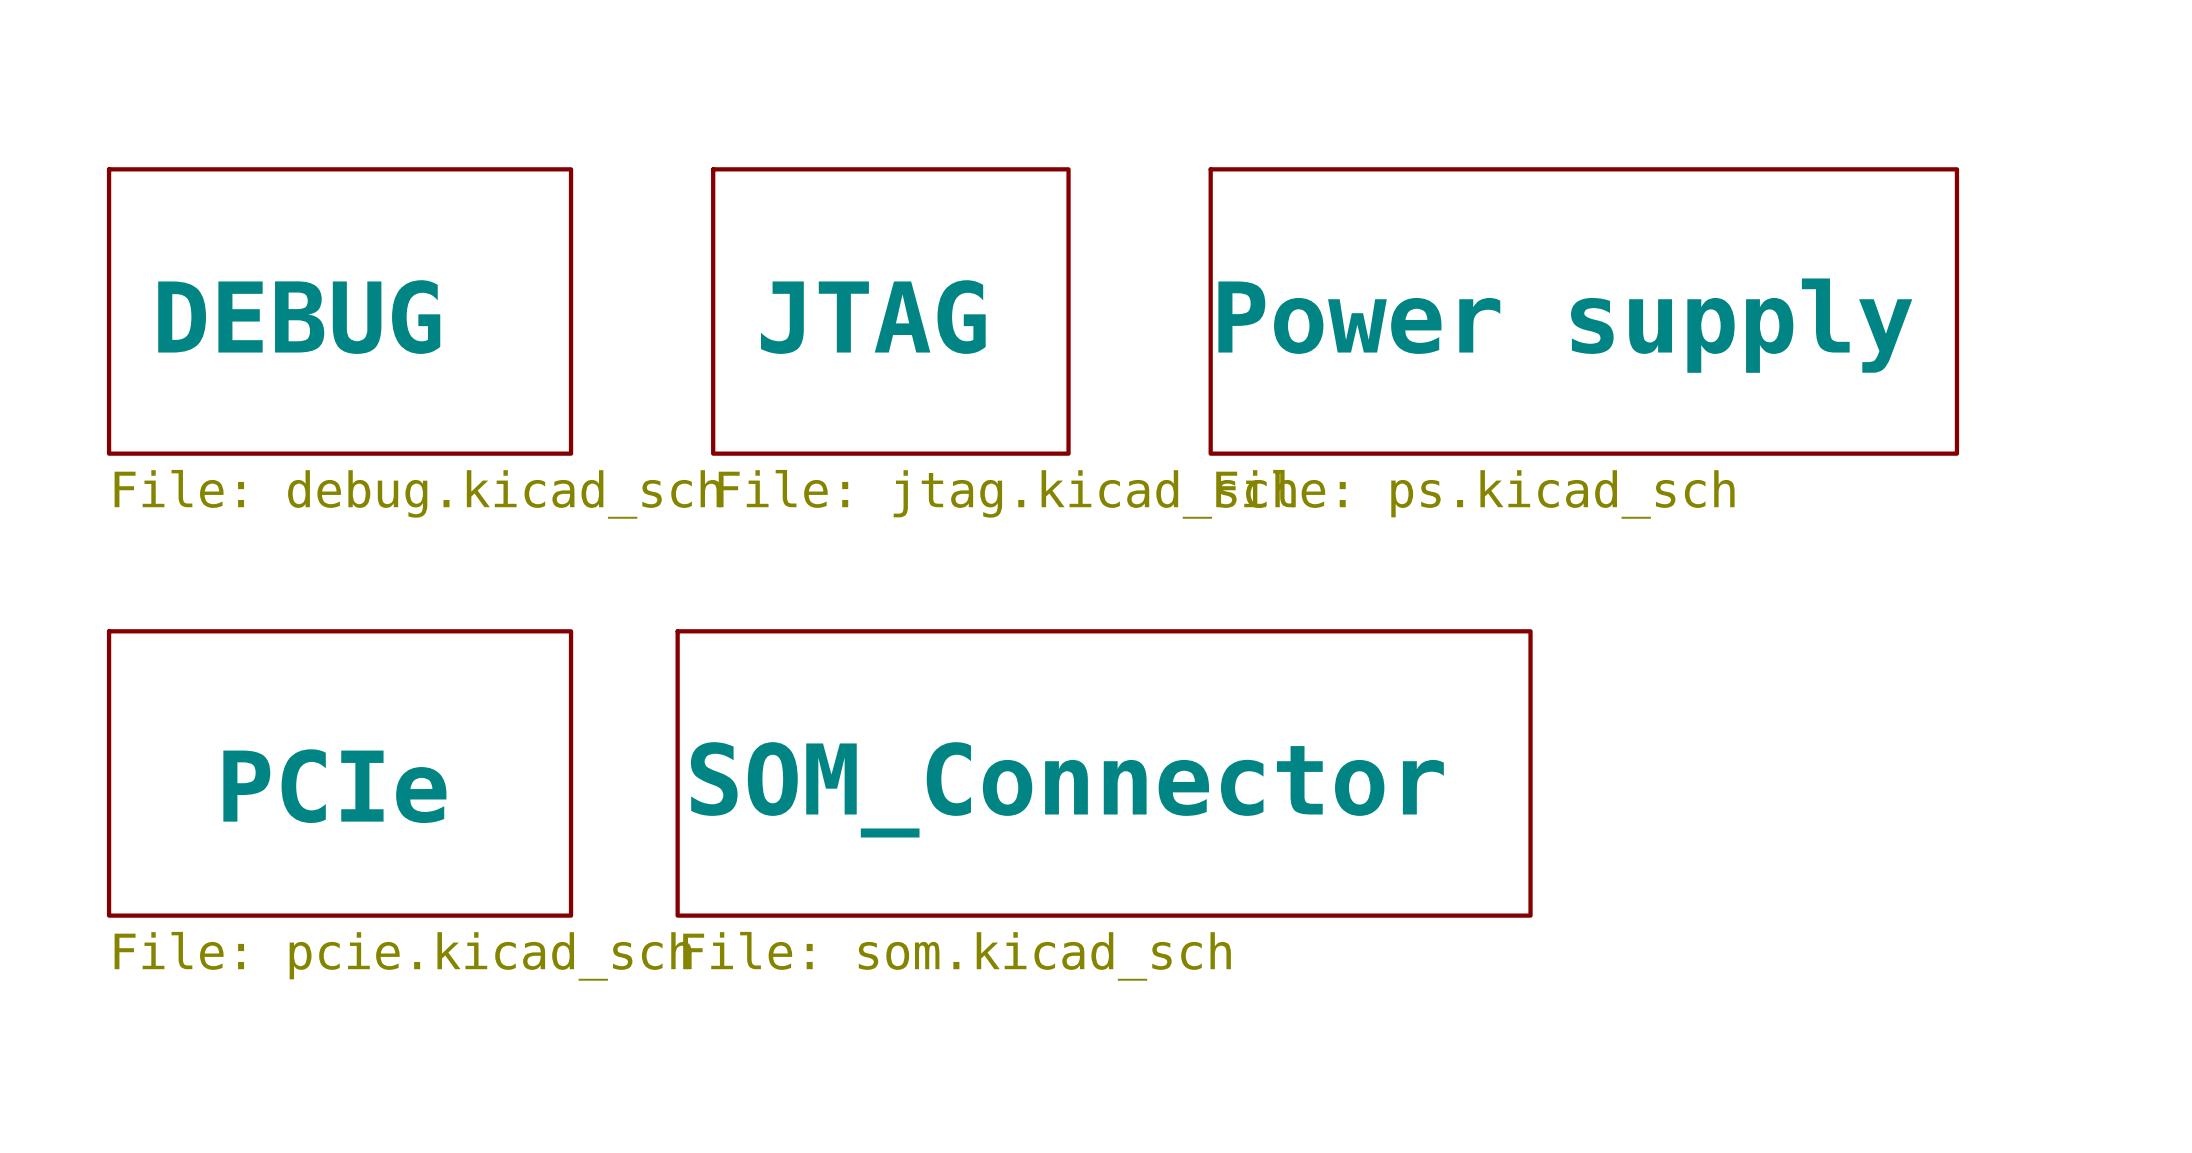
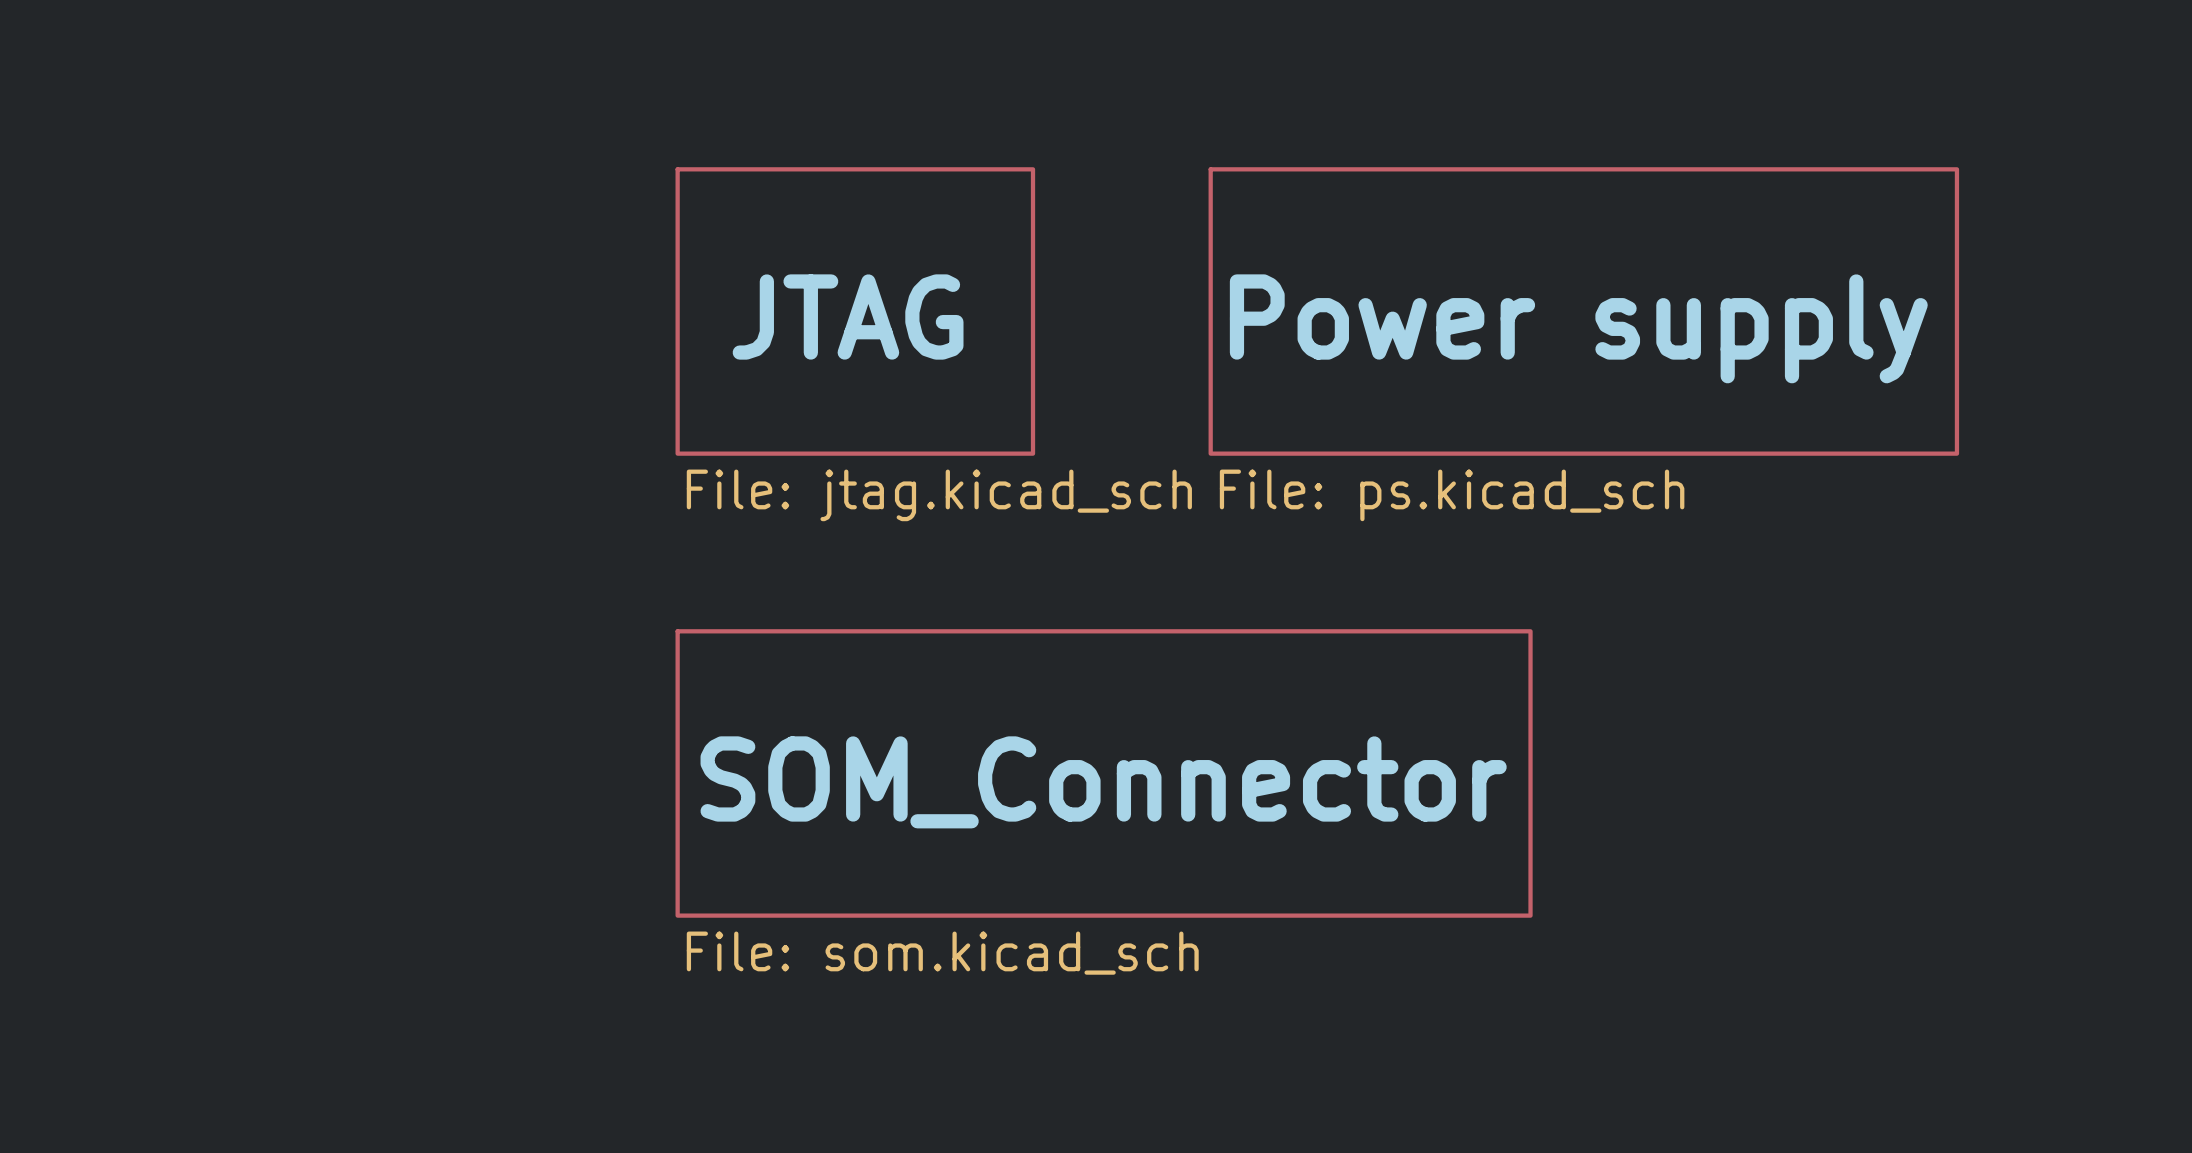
sheet DEBUG: File: debug.kicad_sch (340, 311) -> none
sheet JTAG position: (890, 311) -> (855, 311)
sheet PCIe: File: pcie.kicad_sch (340, 773) -> none

